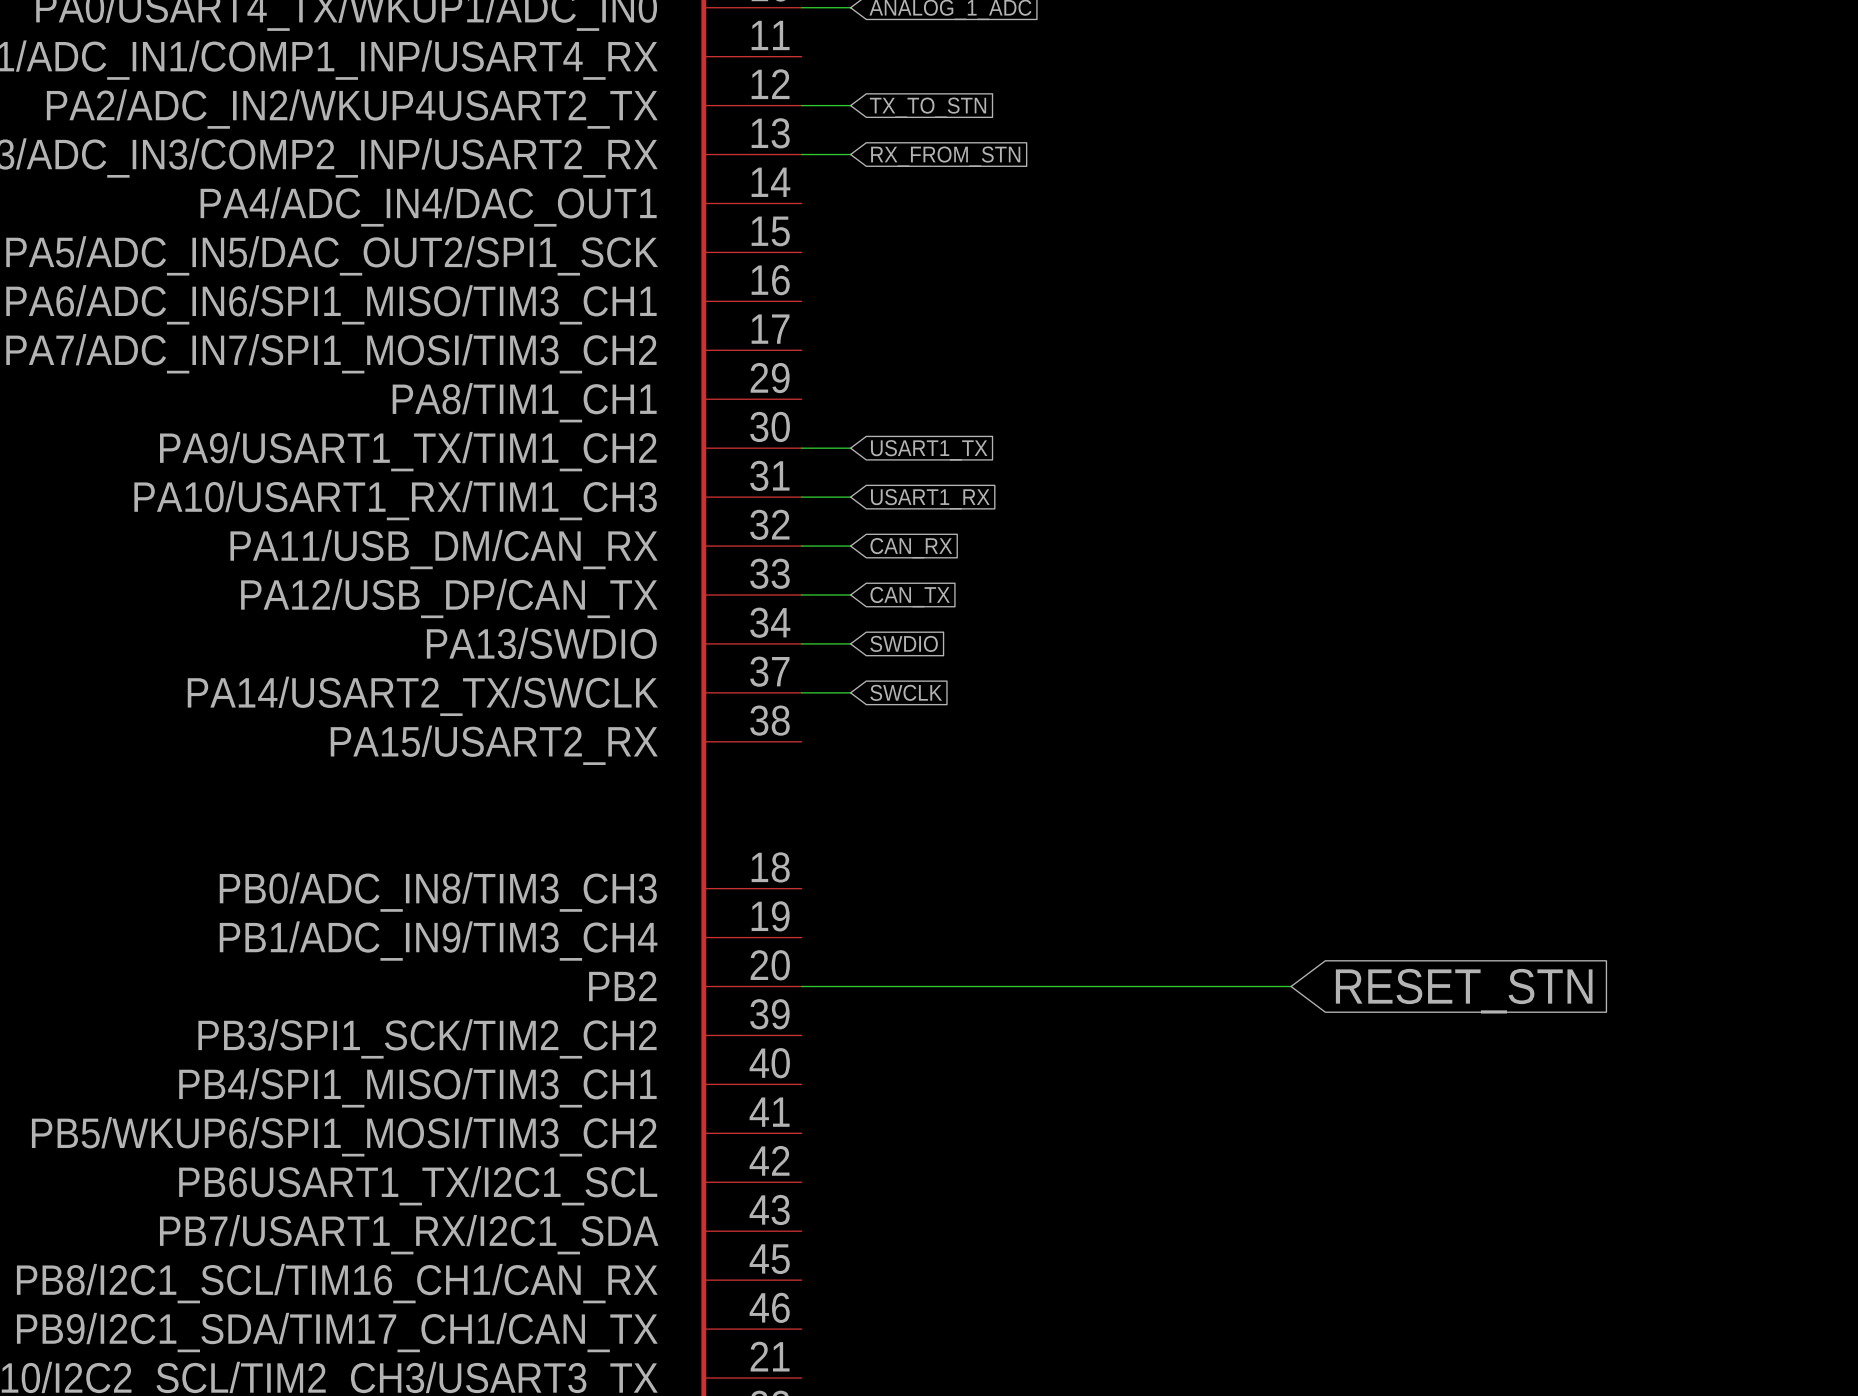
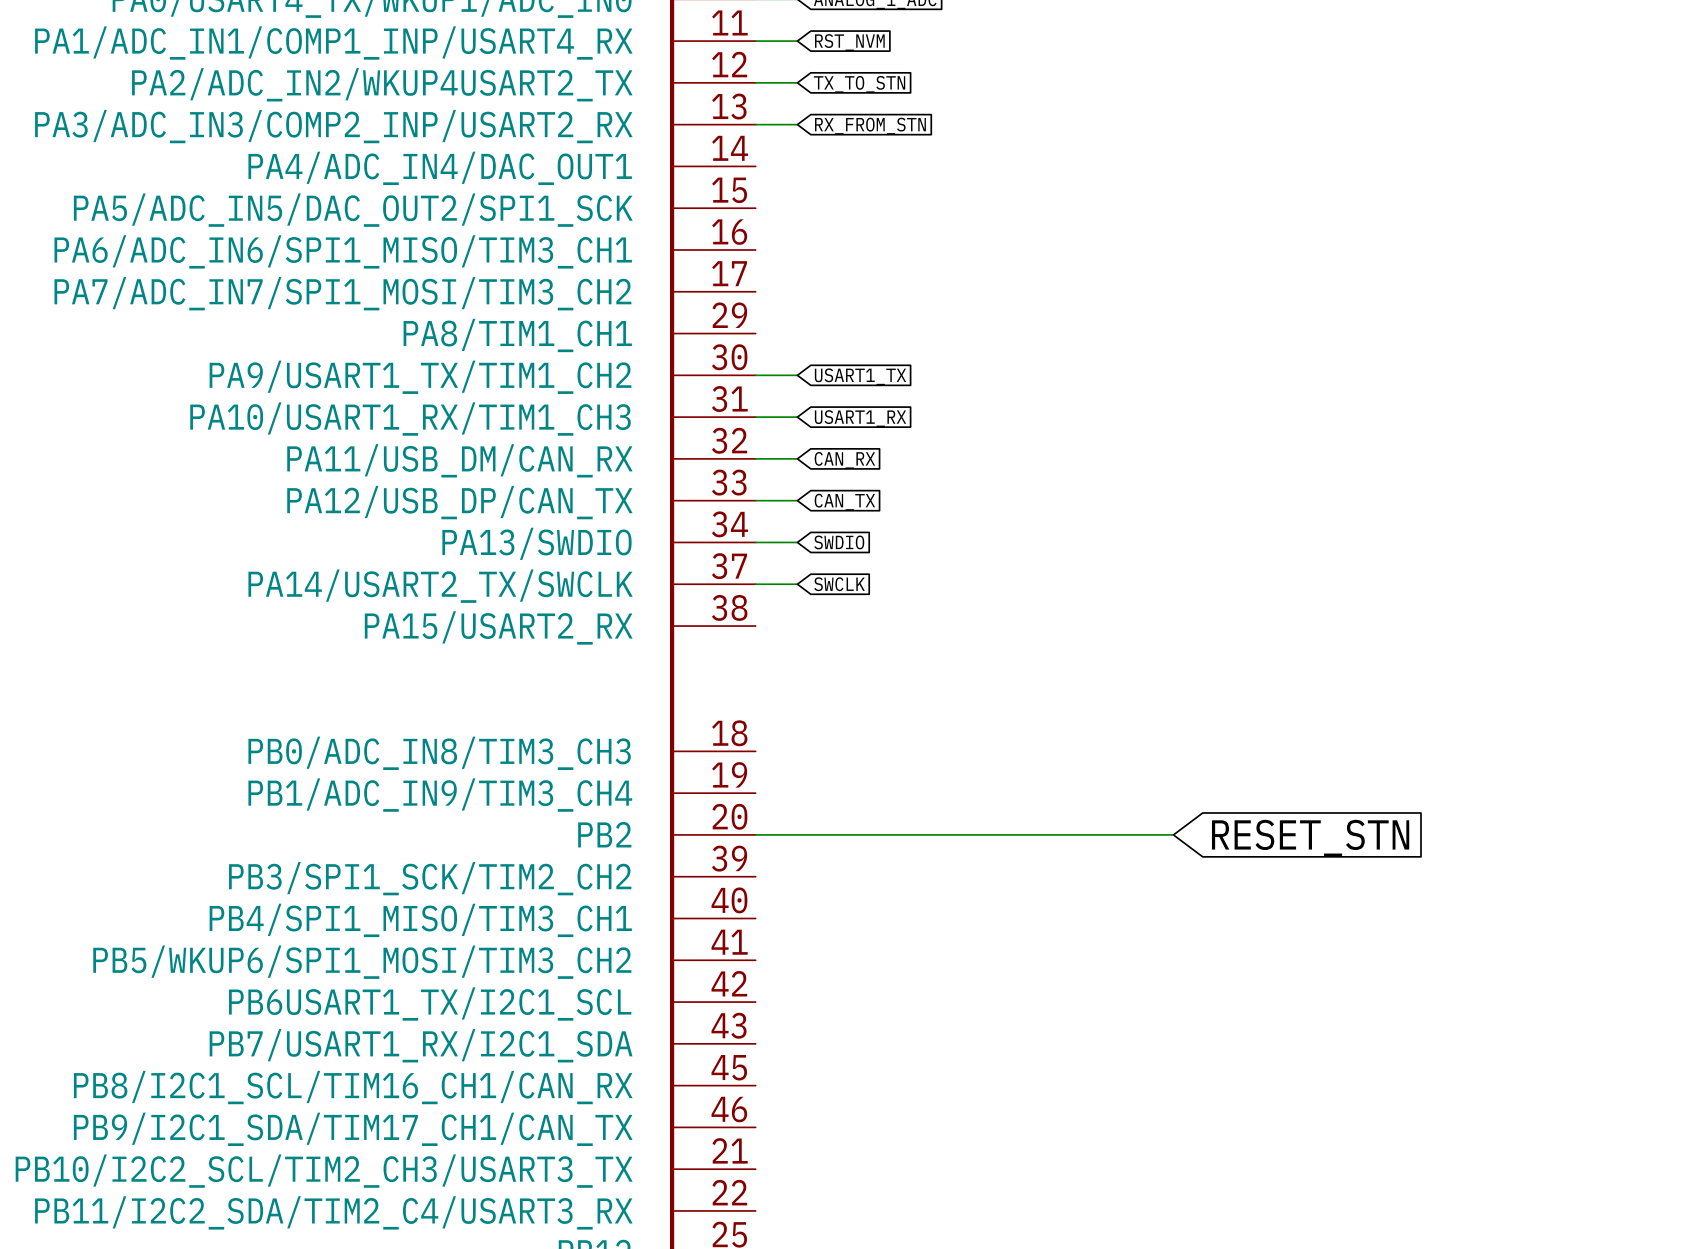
wire: none -> (755, 41) (797, 41)
global label: none -> RST_NVM (849, 42)

